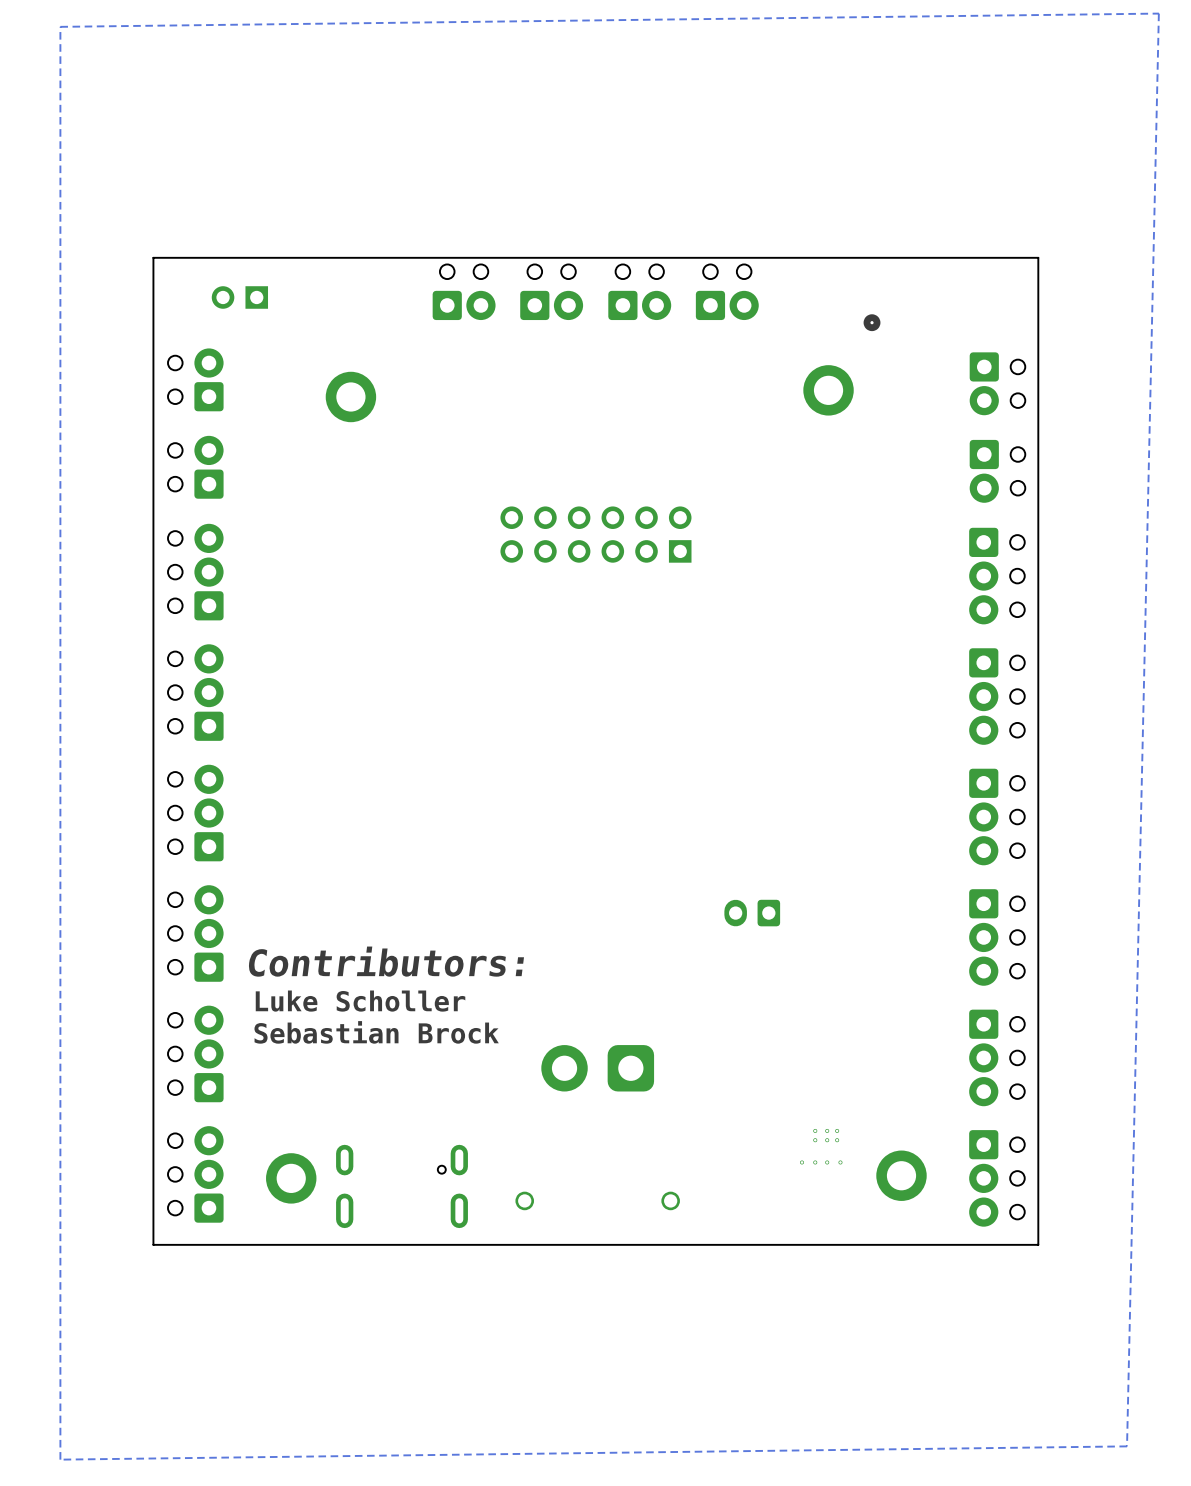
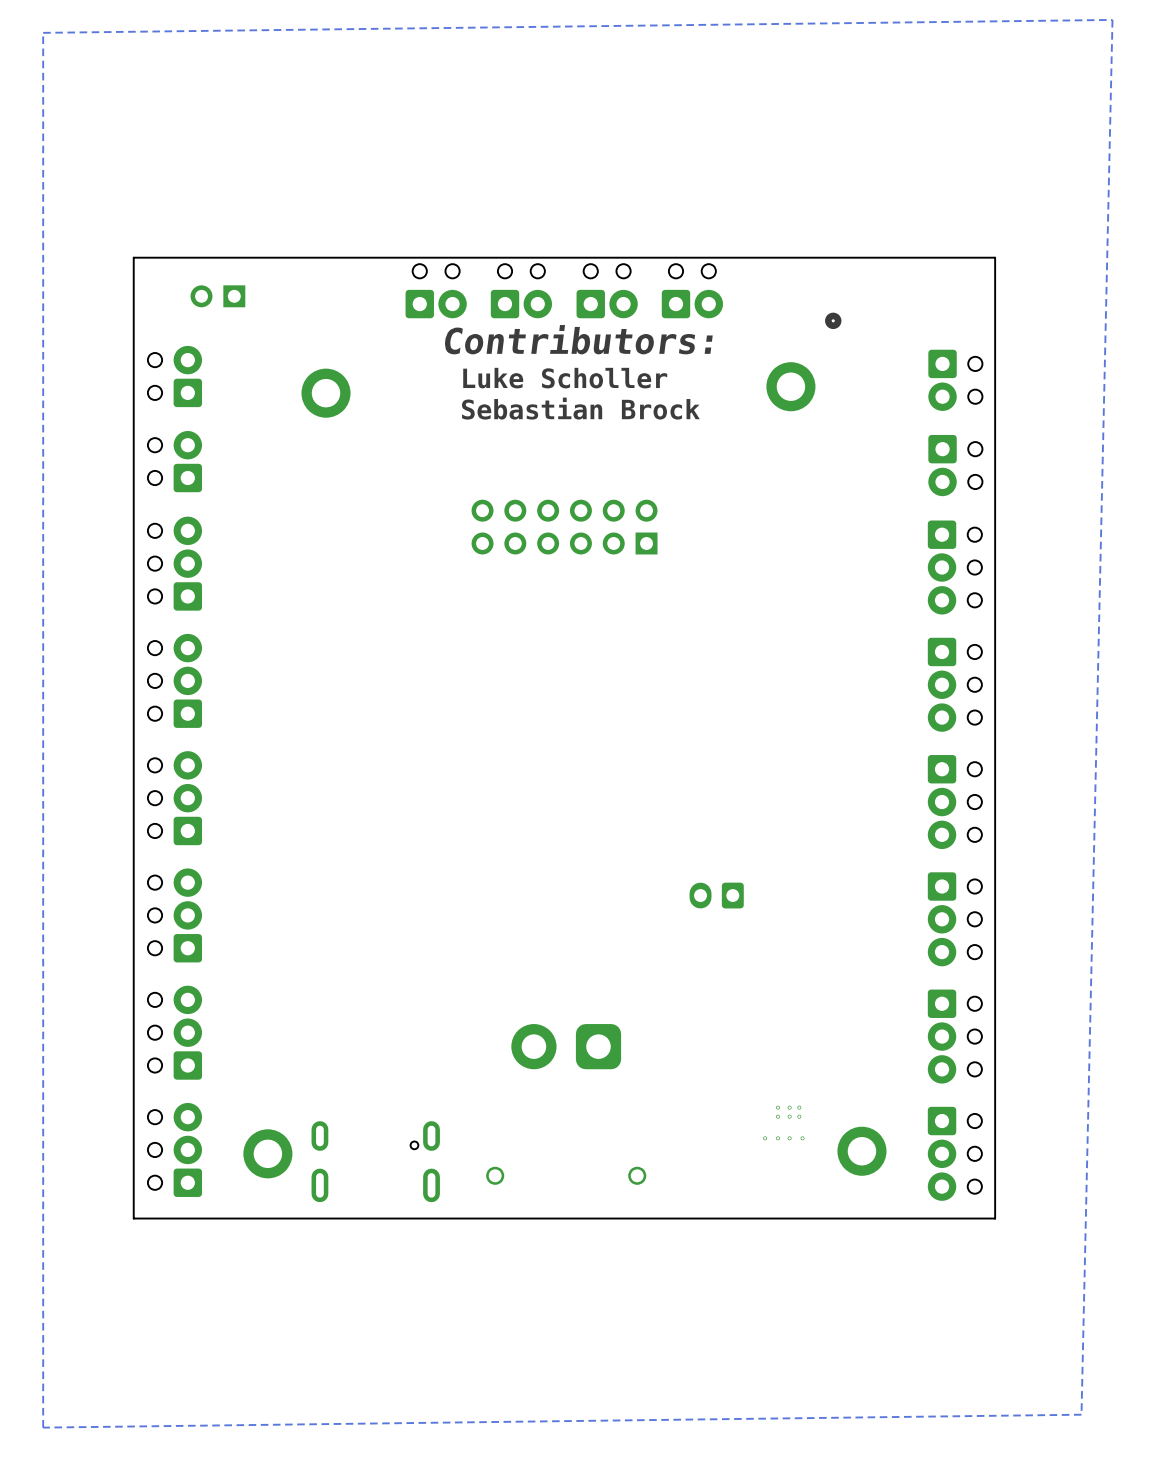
text: none -> Contributors: (578, 339)
text: none -> Luke Scholler (565, 378)
text: none -> Sebastian Brock (580, 408)
text: Contributors: (386, 961) -> none
text: Luke Scholler (360, 1001) -> none
text: Sebastian Brock (376, 1032) -> none

